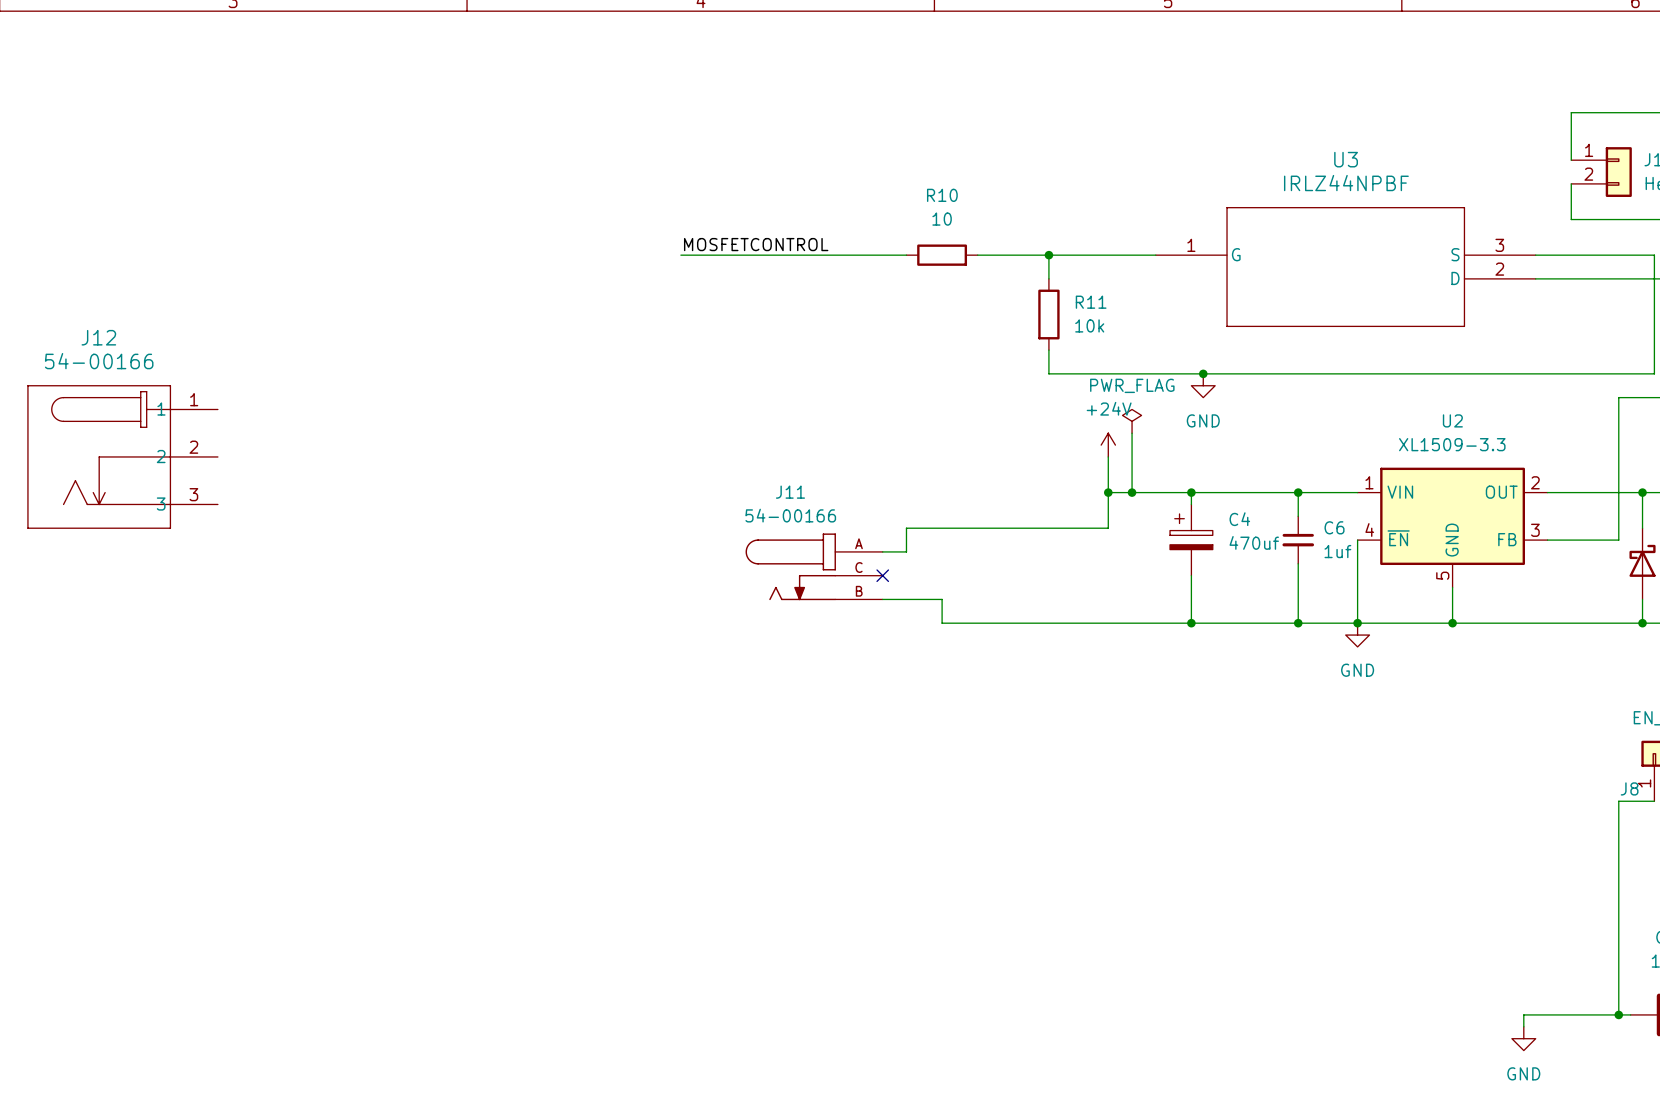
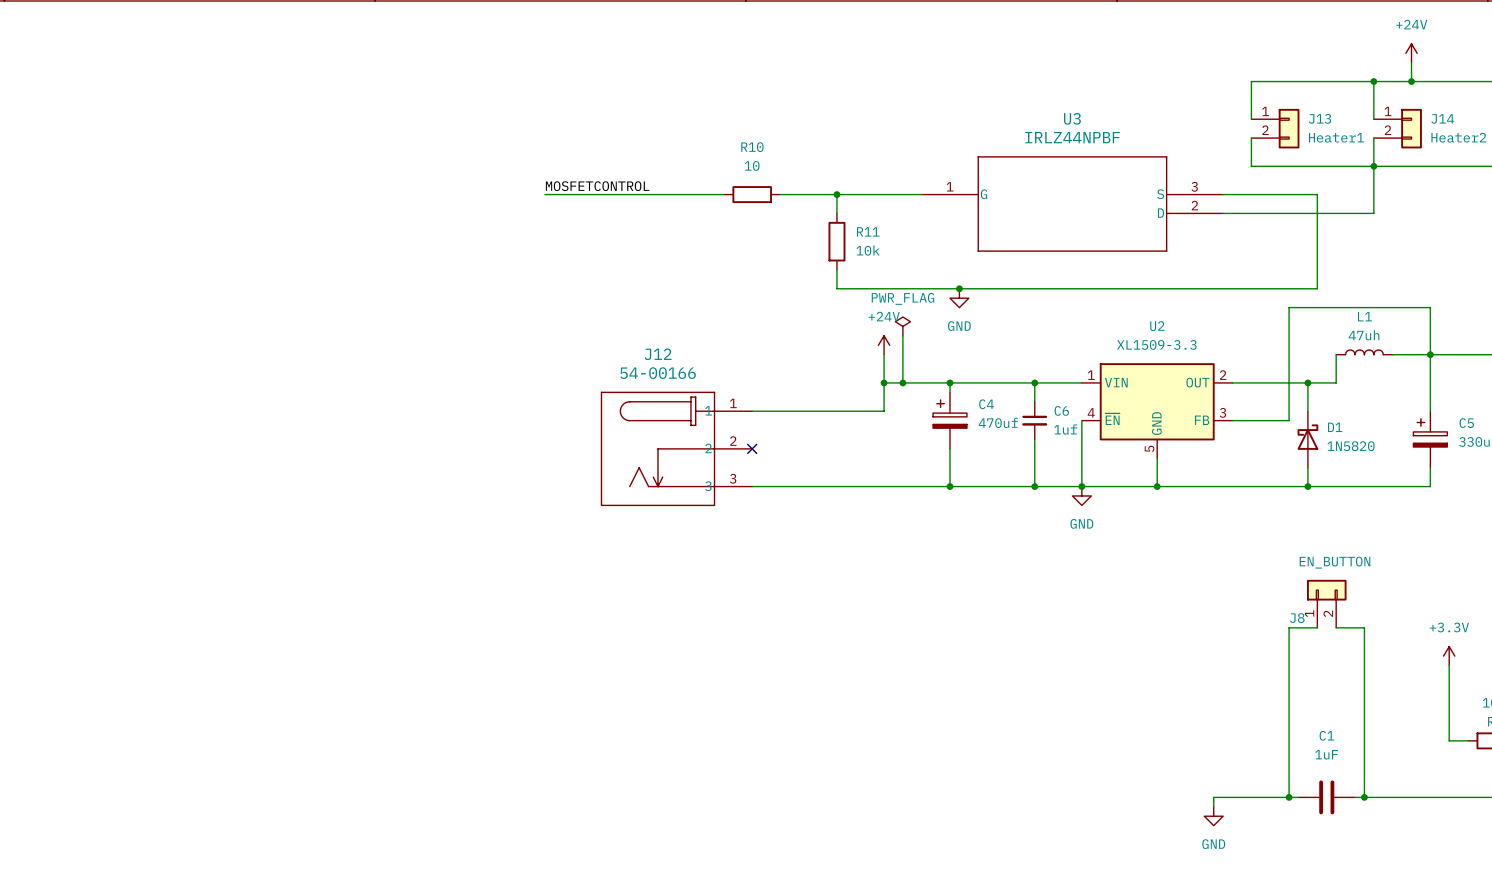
J12 position: (122, 456) -> (676, 448)
wire: (942, 528) (906, 528) (906, 551) (882, 551) -> none
J11: 54-00166 (814, 566) -> none
no-connect mark: (882, 575) -> none
no-connect mark: none -> (752, 448)
wire: (882, 599) (942, 599) (942, 623) -> none

